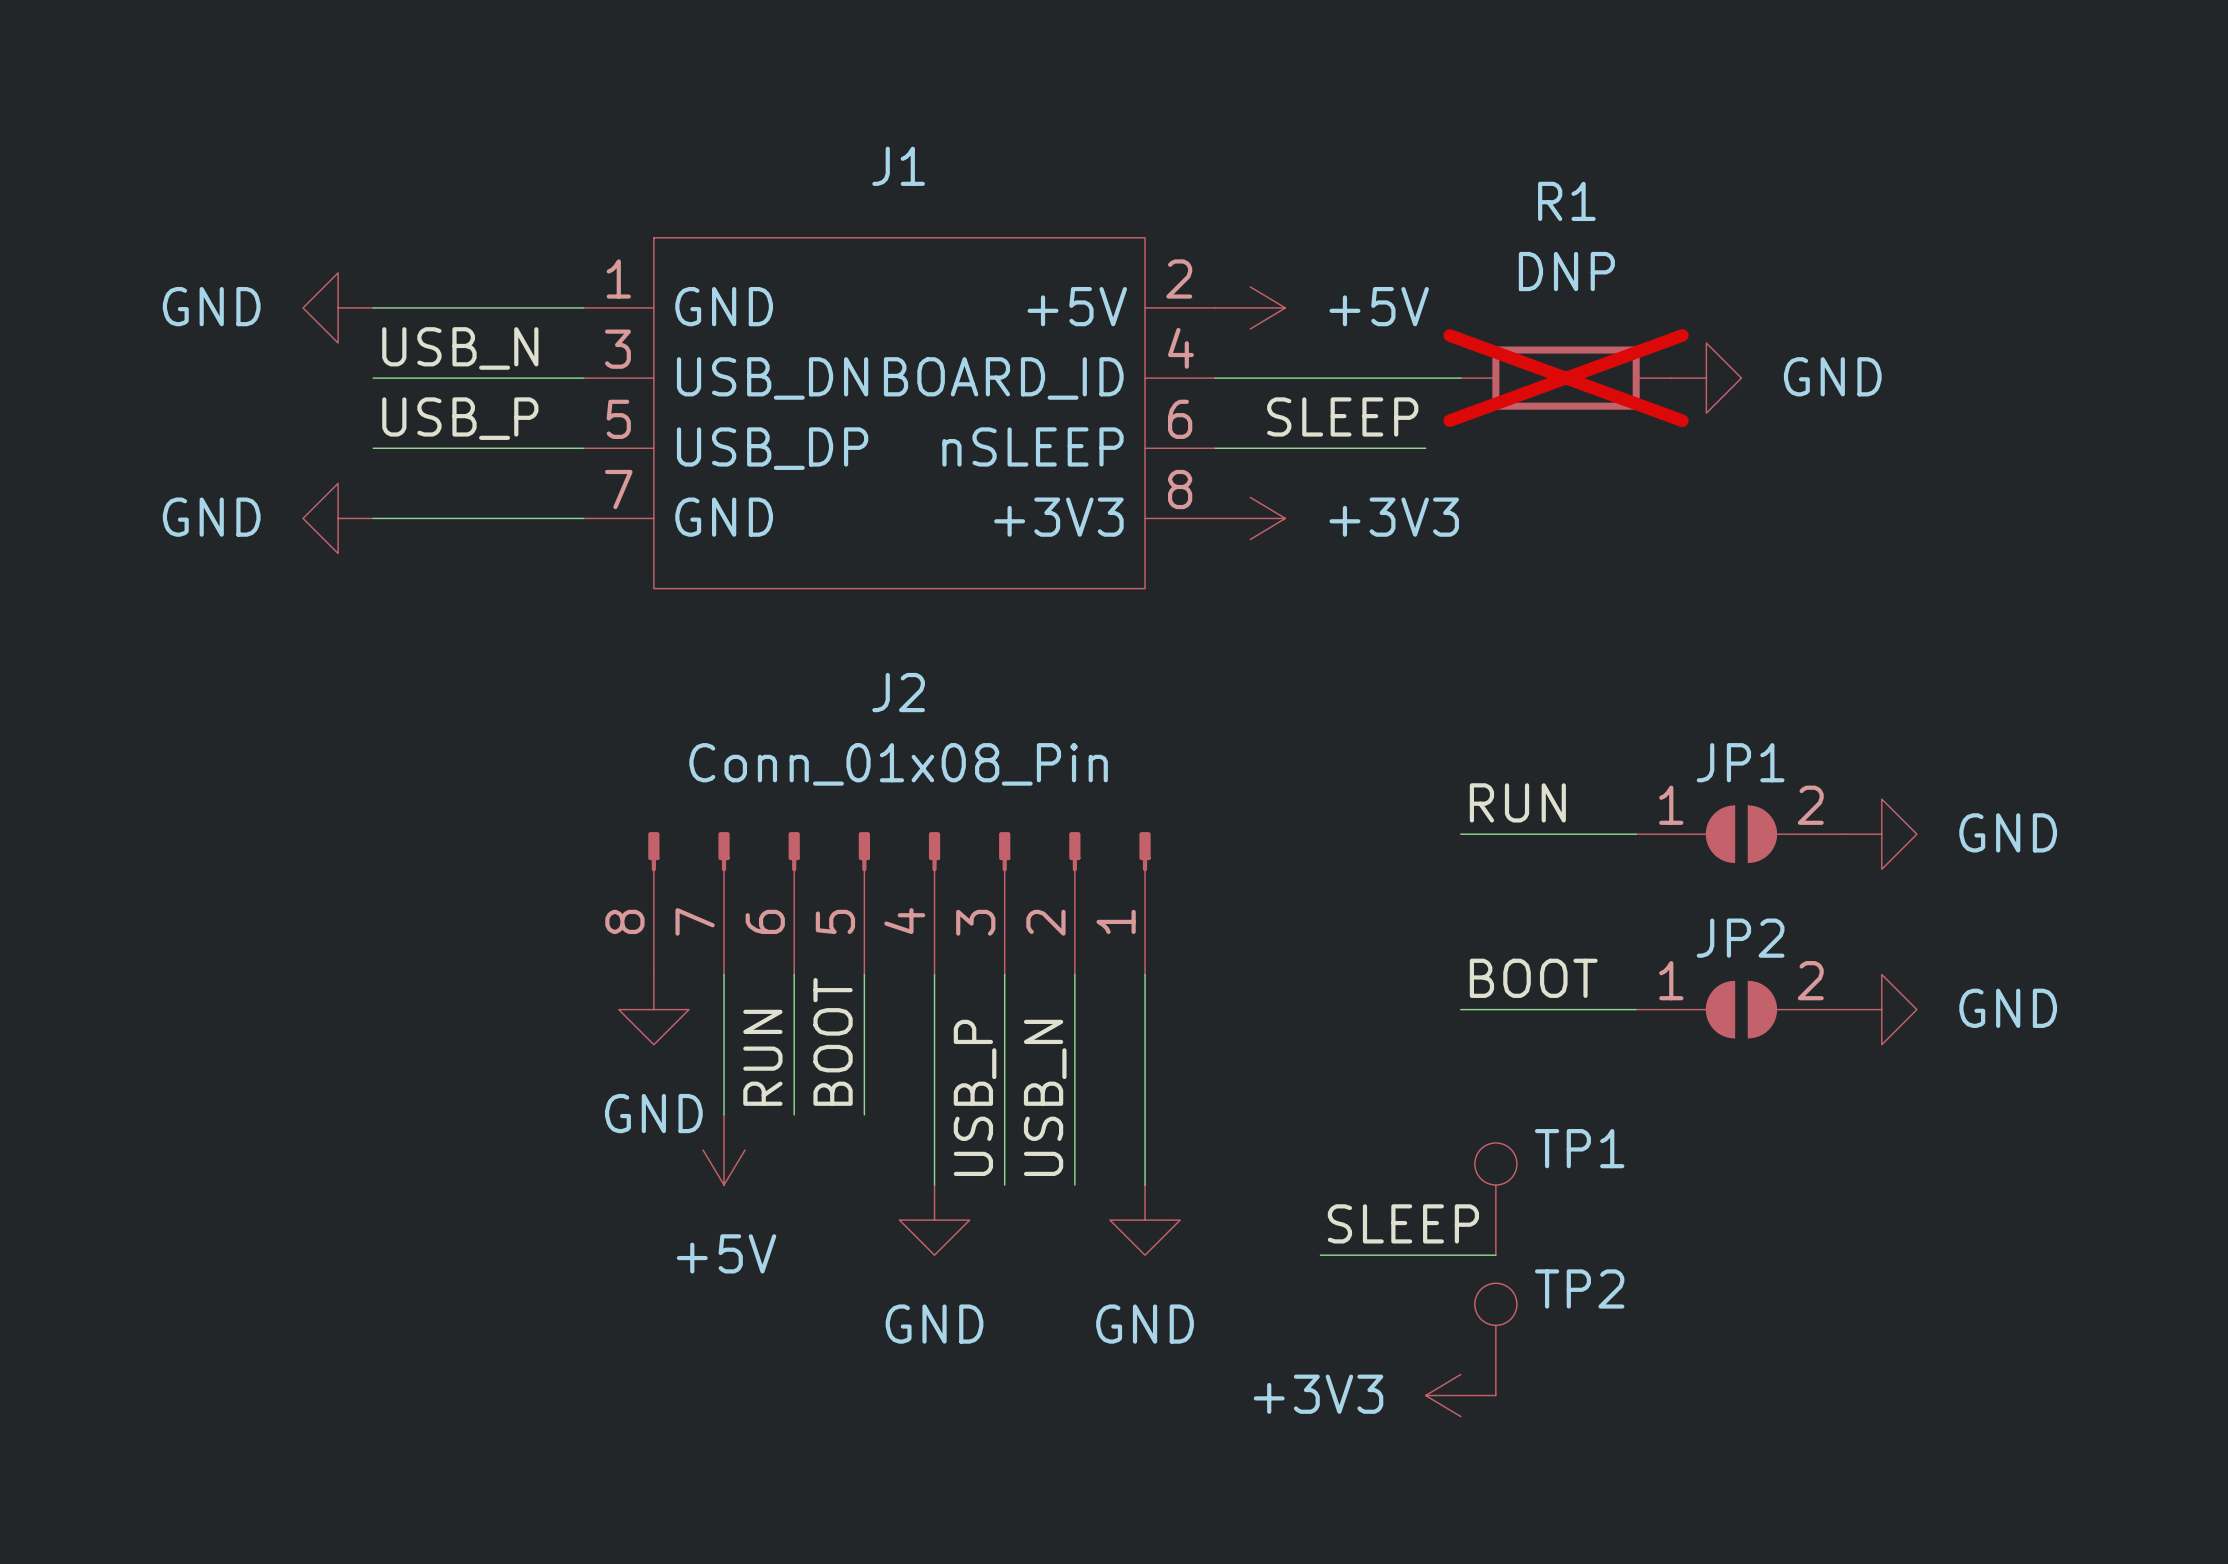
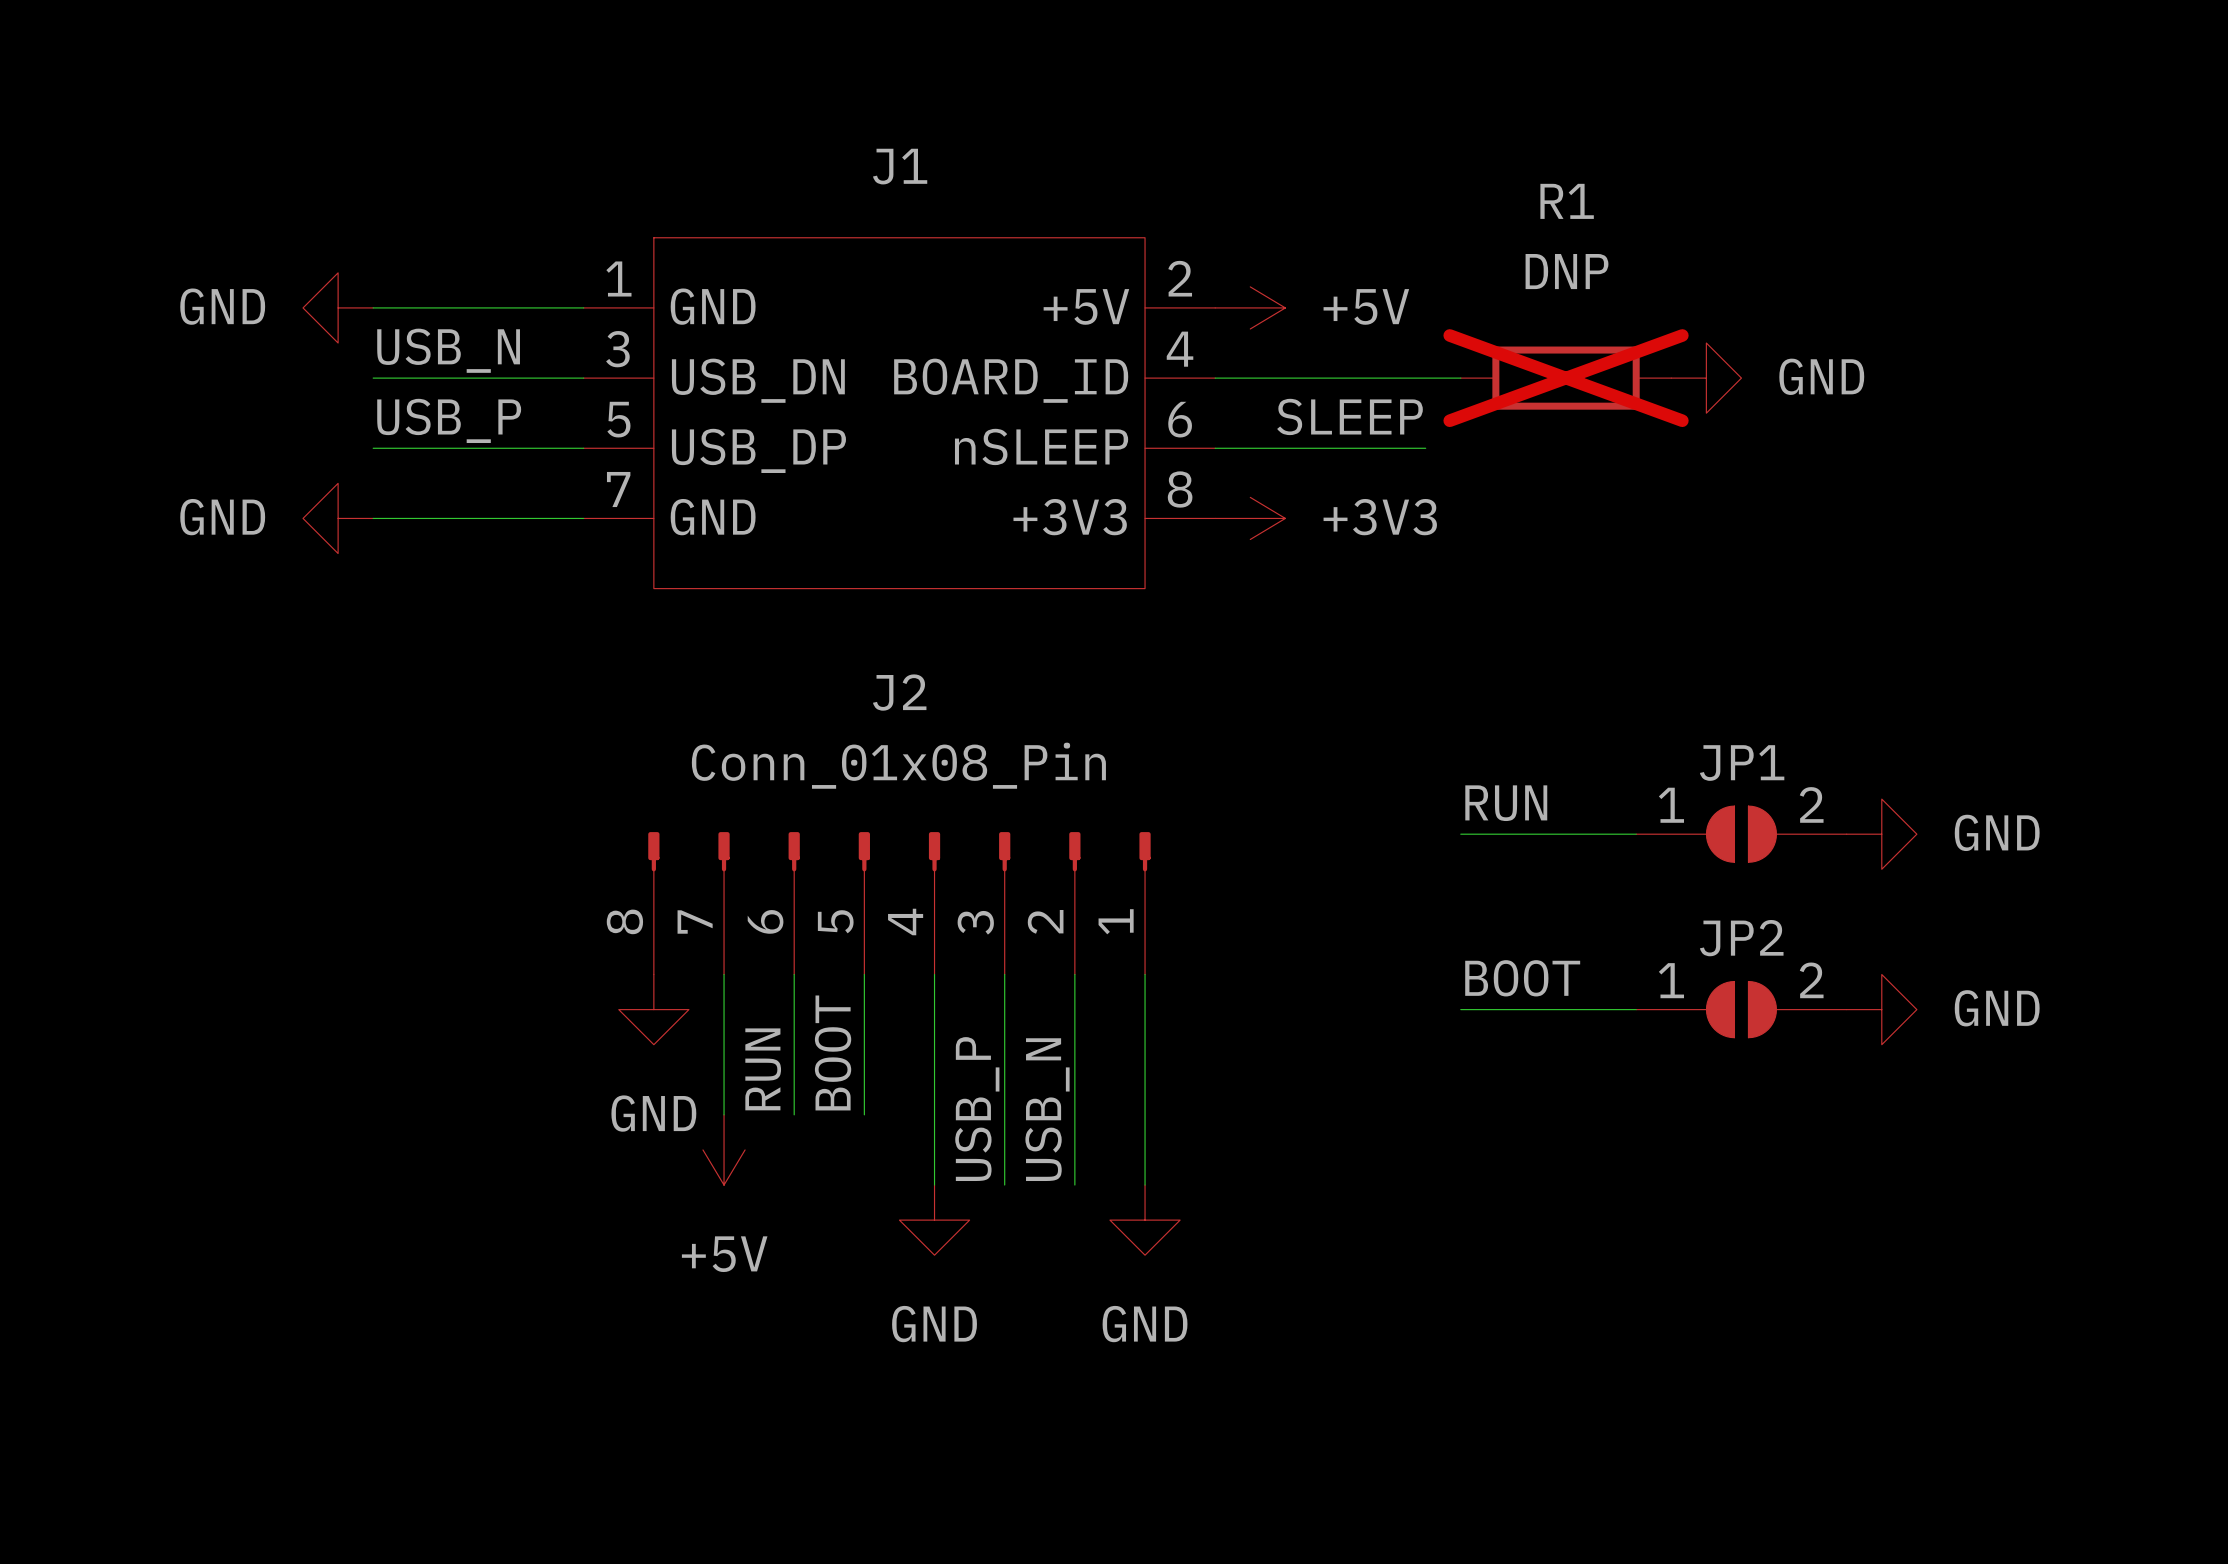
TP1: (1495, 1199) -> none
label: SLEEP (1403, 1223) -> none
wire: (1320, 1255) (1495, 1255) -> none
TP2: (1495, 1339) -> none
power symbol: +3V3 (1460, 1395) -> none

